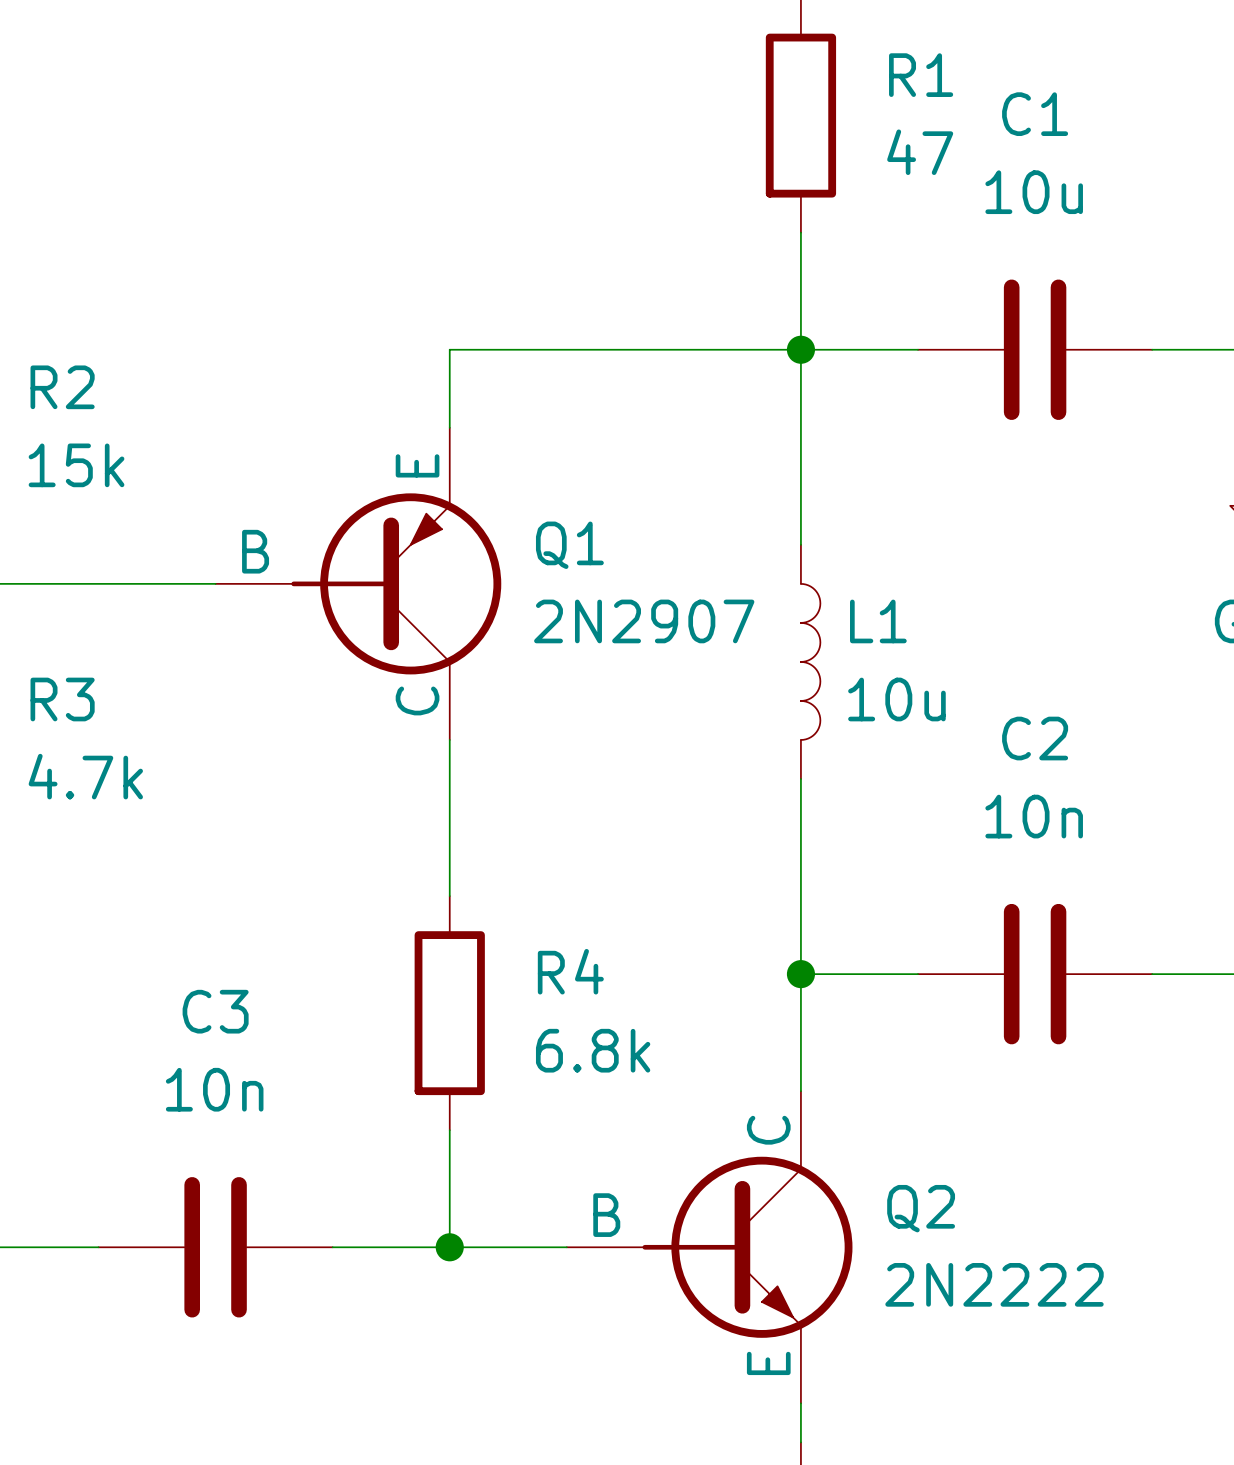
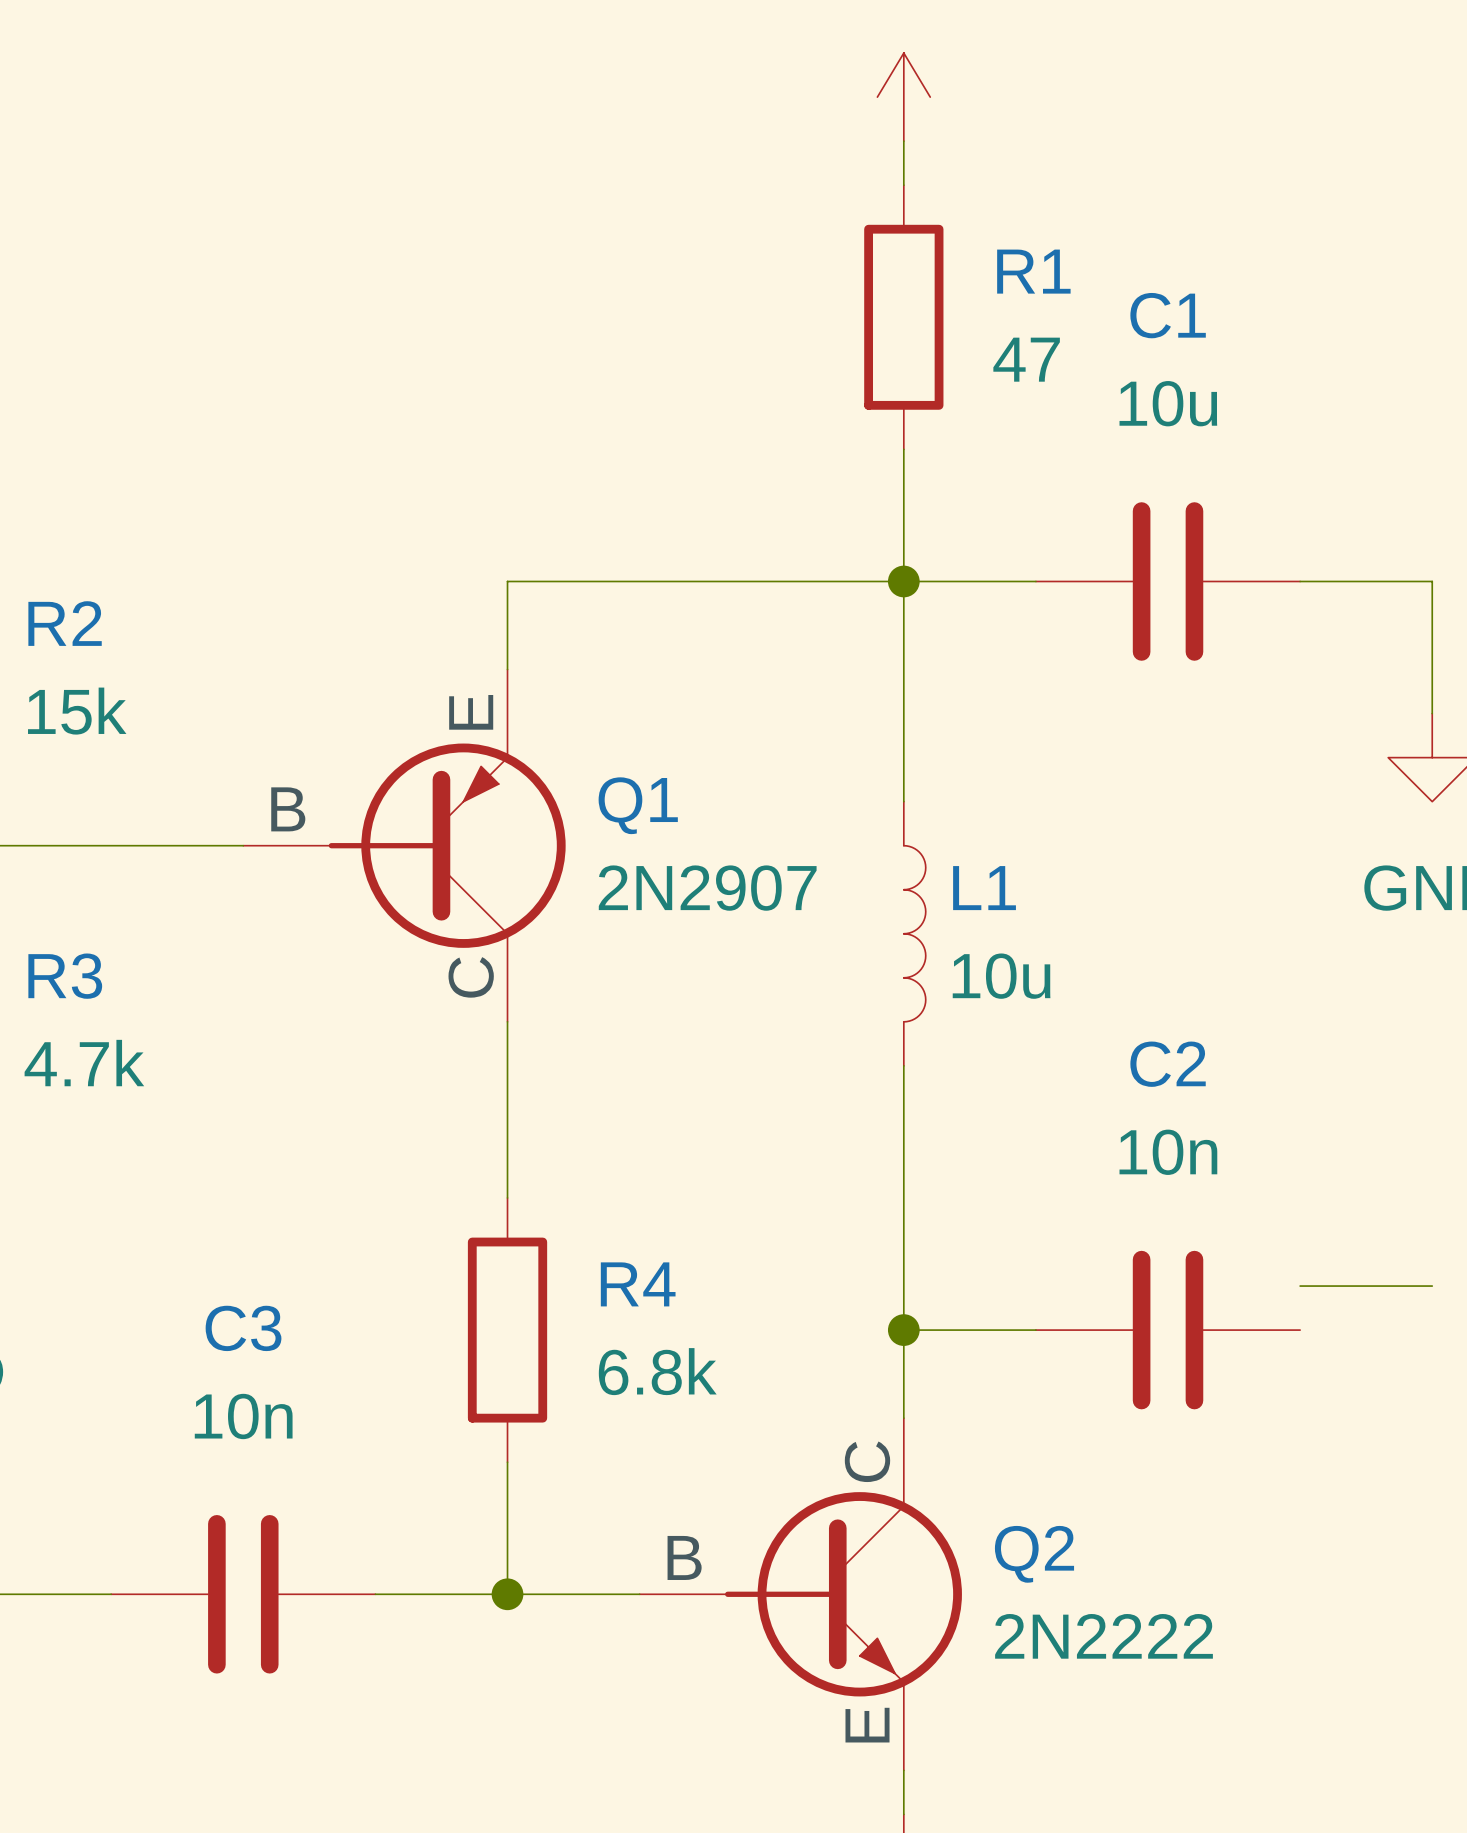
wire: (800, 974) (918, 974) -> (903, 1330) (1035, 1330)
junction position: (800, 974) -> (903, 1330)
C2 position: (1035, 974) -> (1168, 1330)

